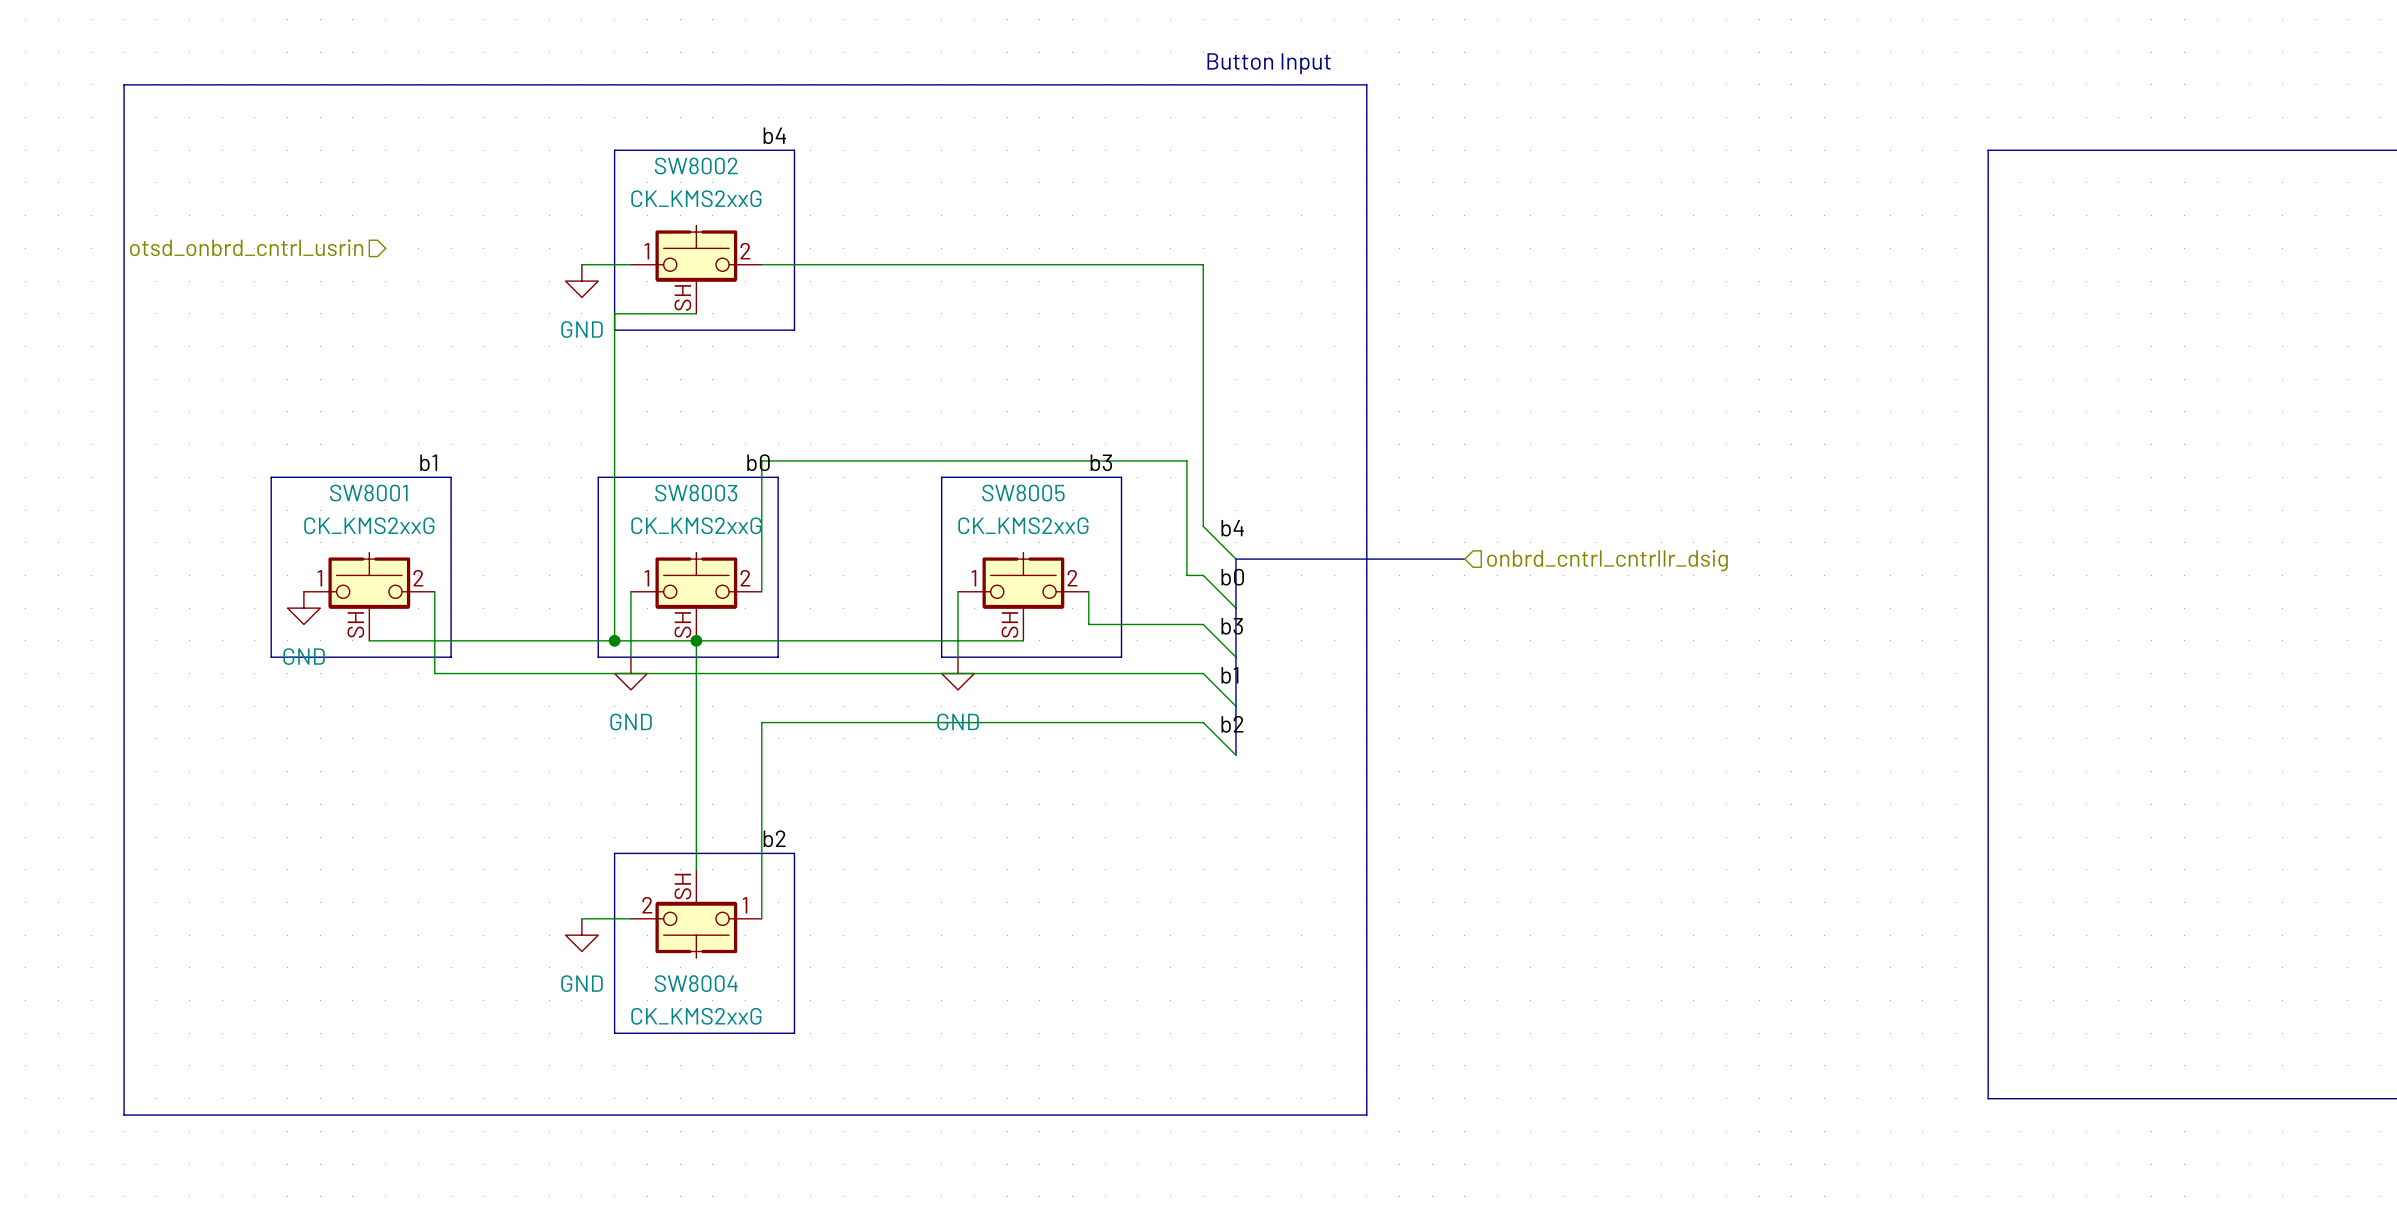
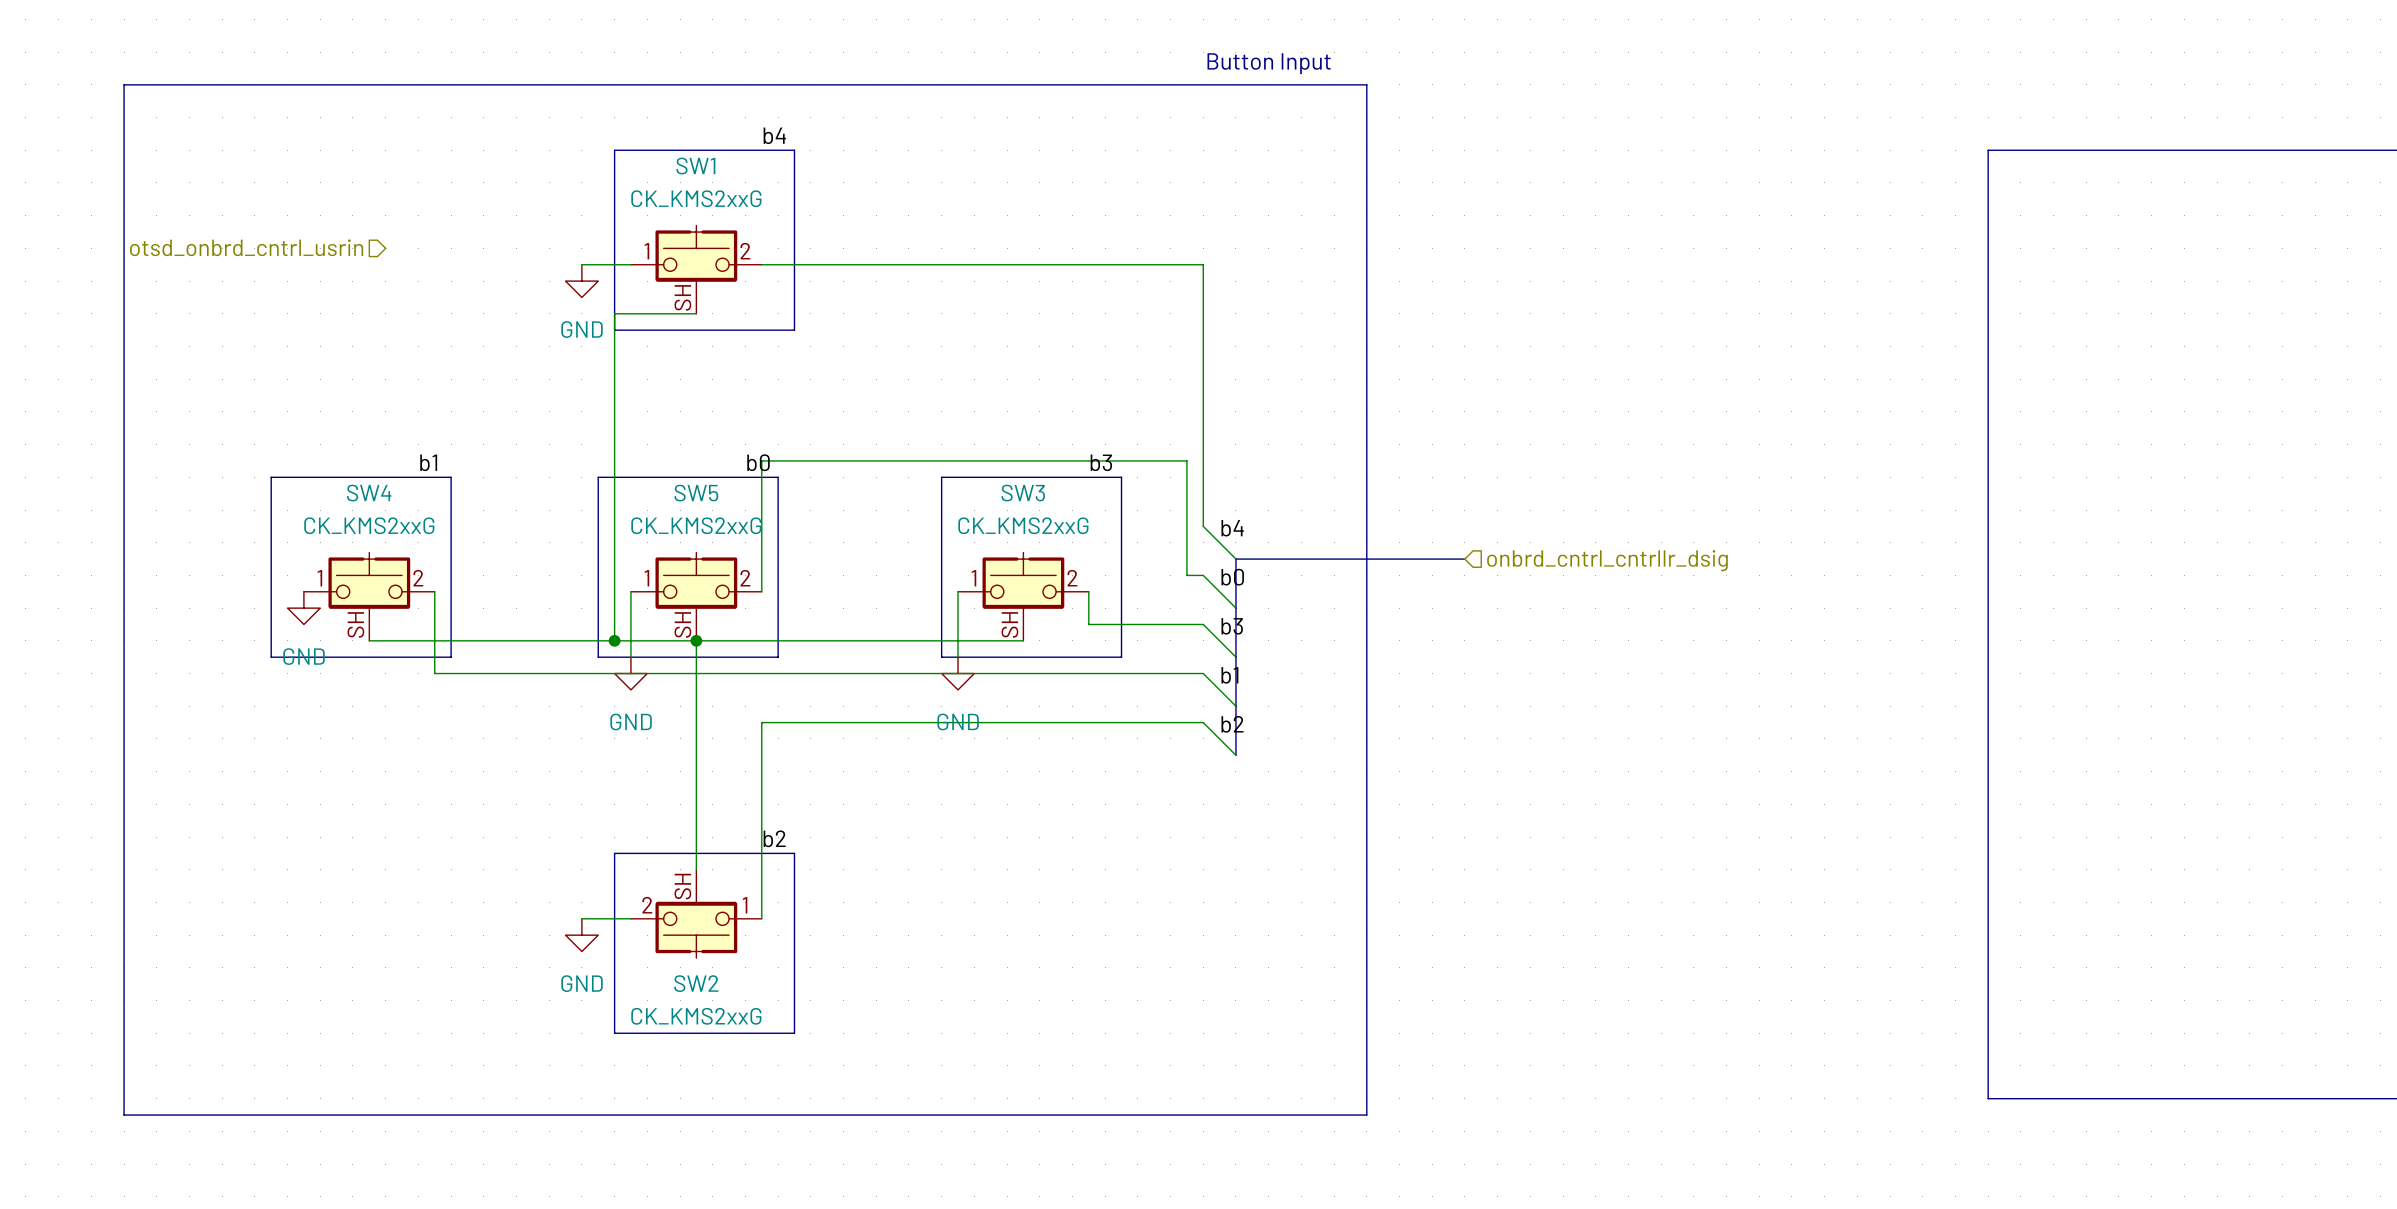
SW8002 name: SW8002 (696, 166) -> SW1 (695, 166)
SW8001 name: SW8001 (368, 493) -> SW4 (369, 493)
SW8003 name: SW8003 (696, 493) -> SW5 (696, 493)
SW8005 name: SW8005 (1023, 493) -> SW3 (1023, 493)
SW8004 name: SW8004 (696, 983) -> SW2 (696, 983)

